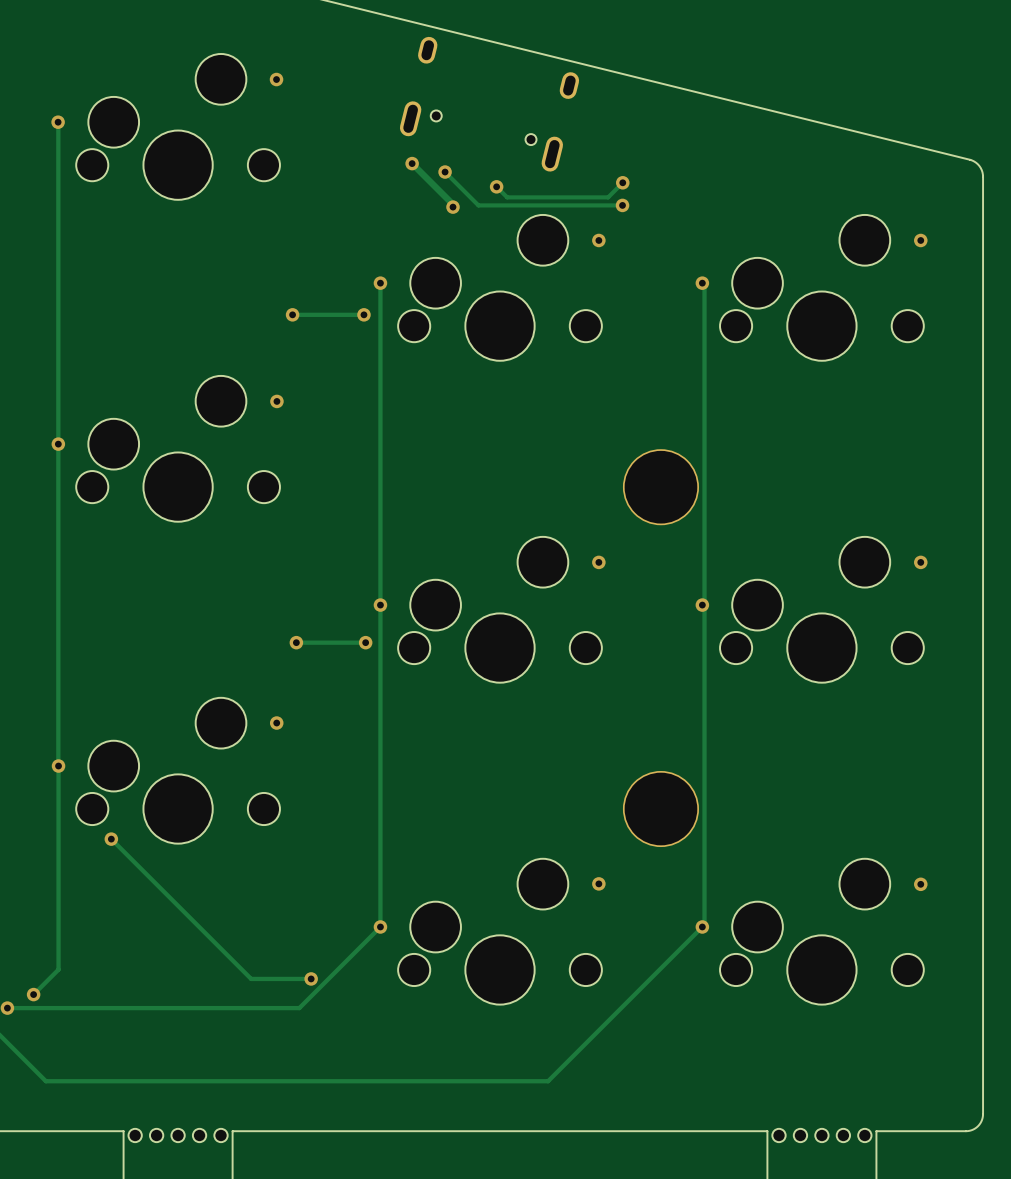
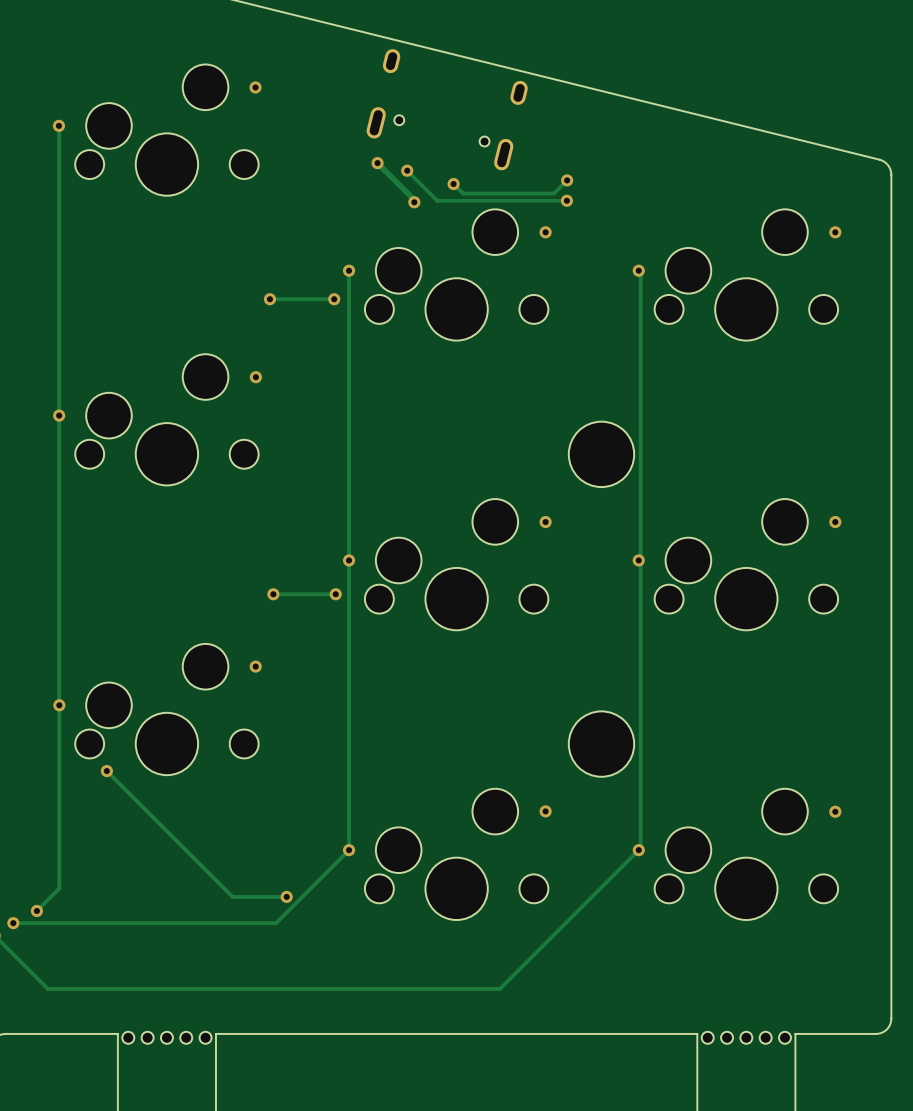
part footprint: [622, 449, 699, 526] -> [568, 421, 635, 488]
part footprint: [622, 770, 699, 848] -> [568, 711, 635, 777]

